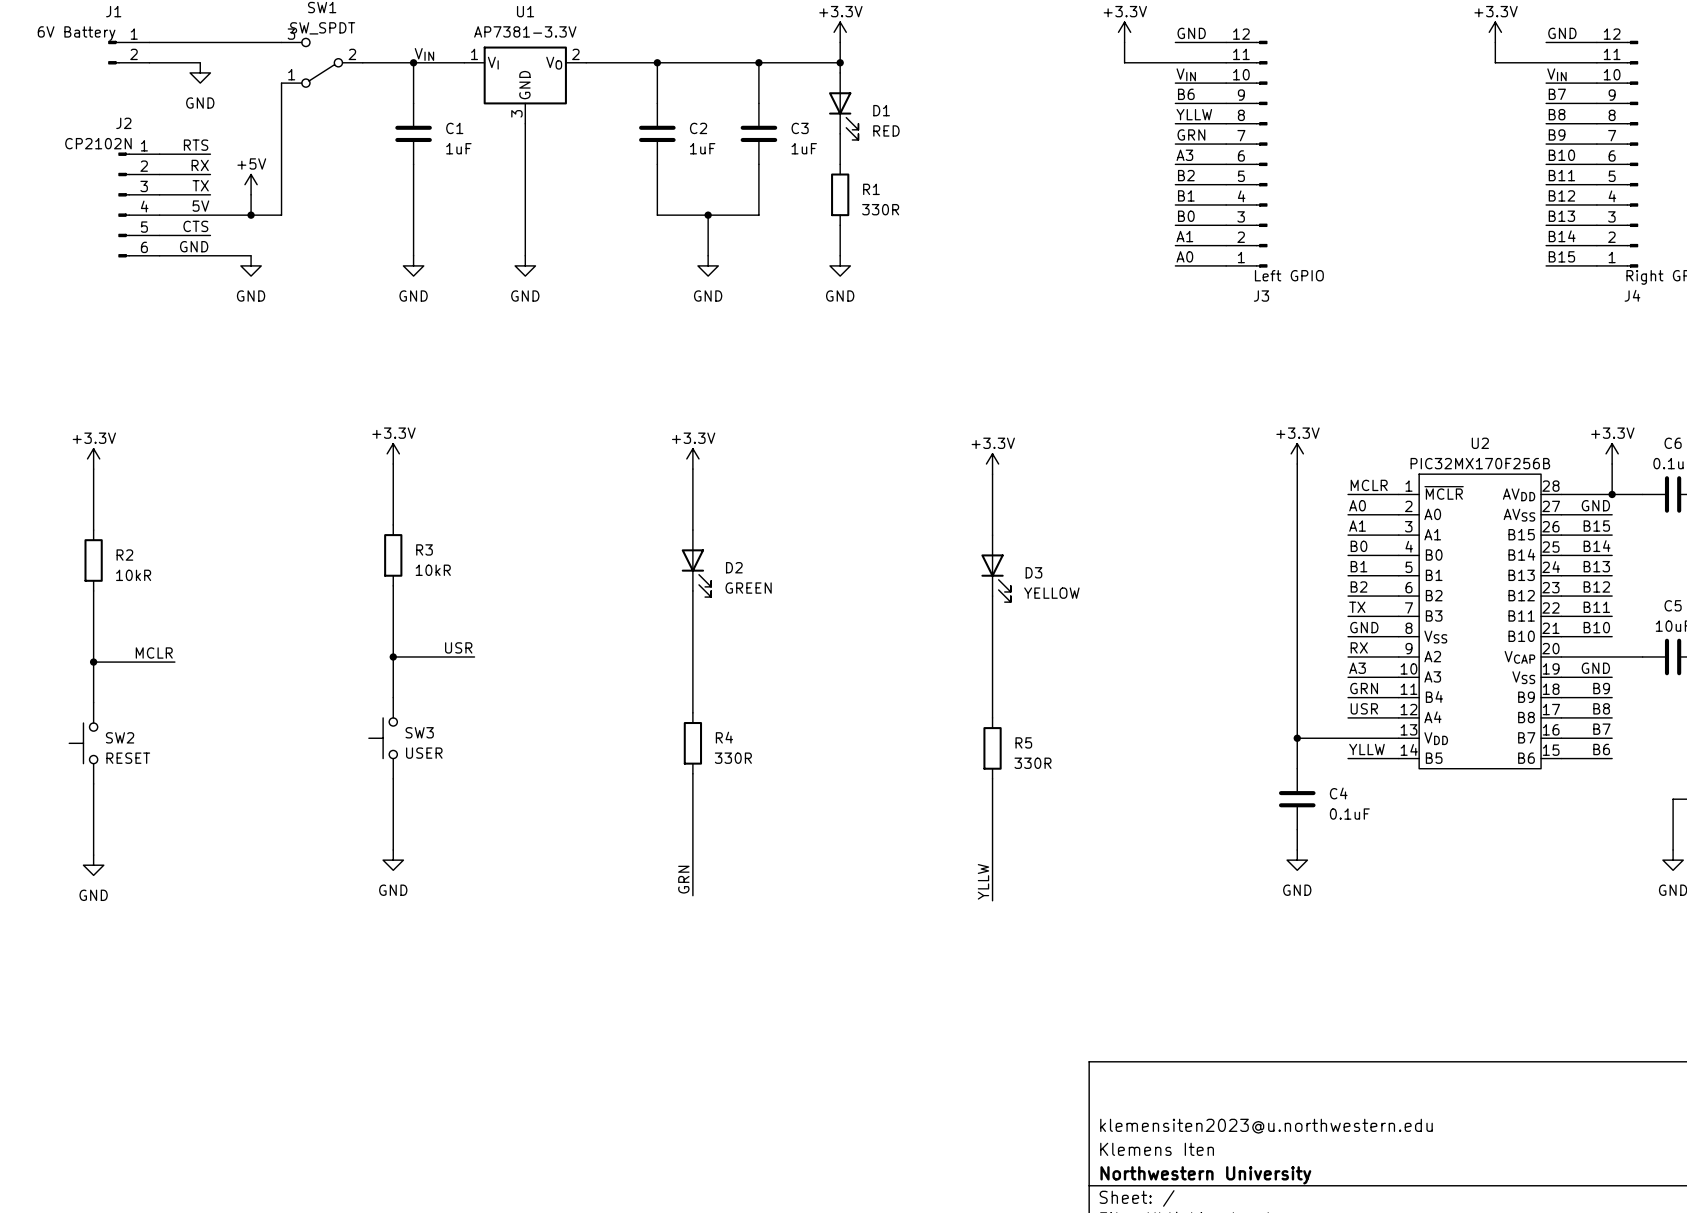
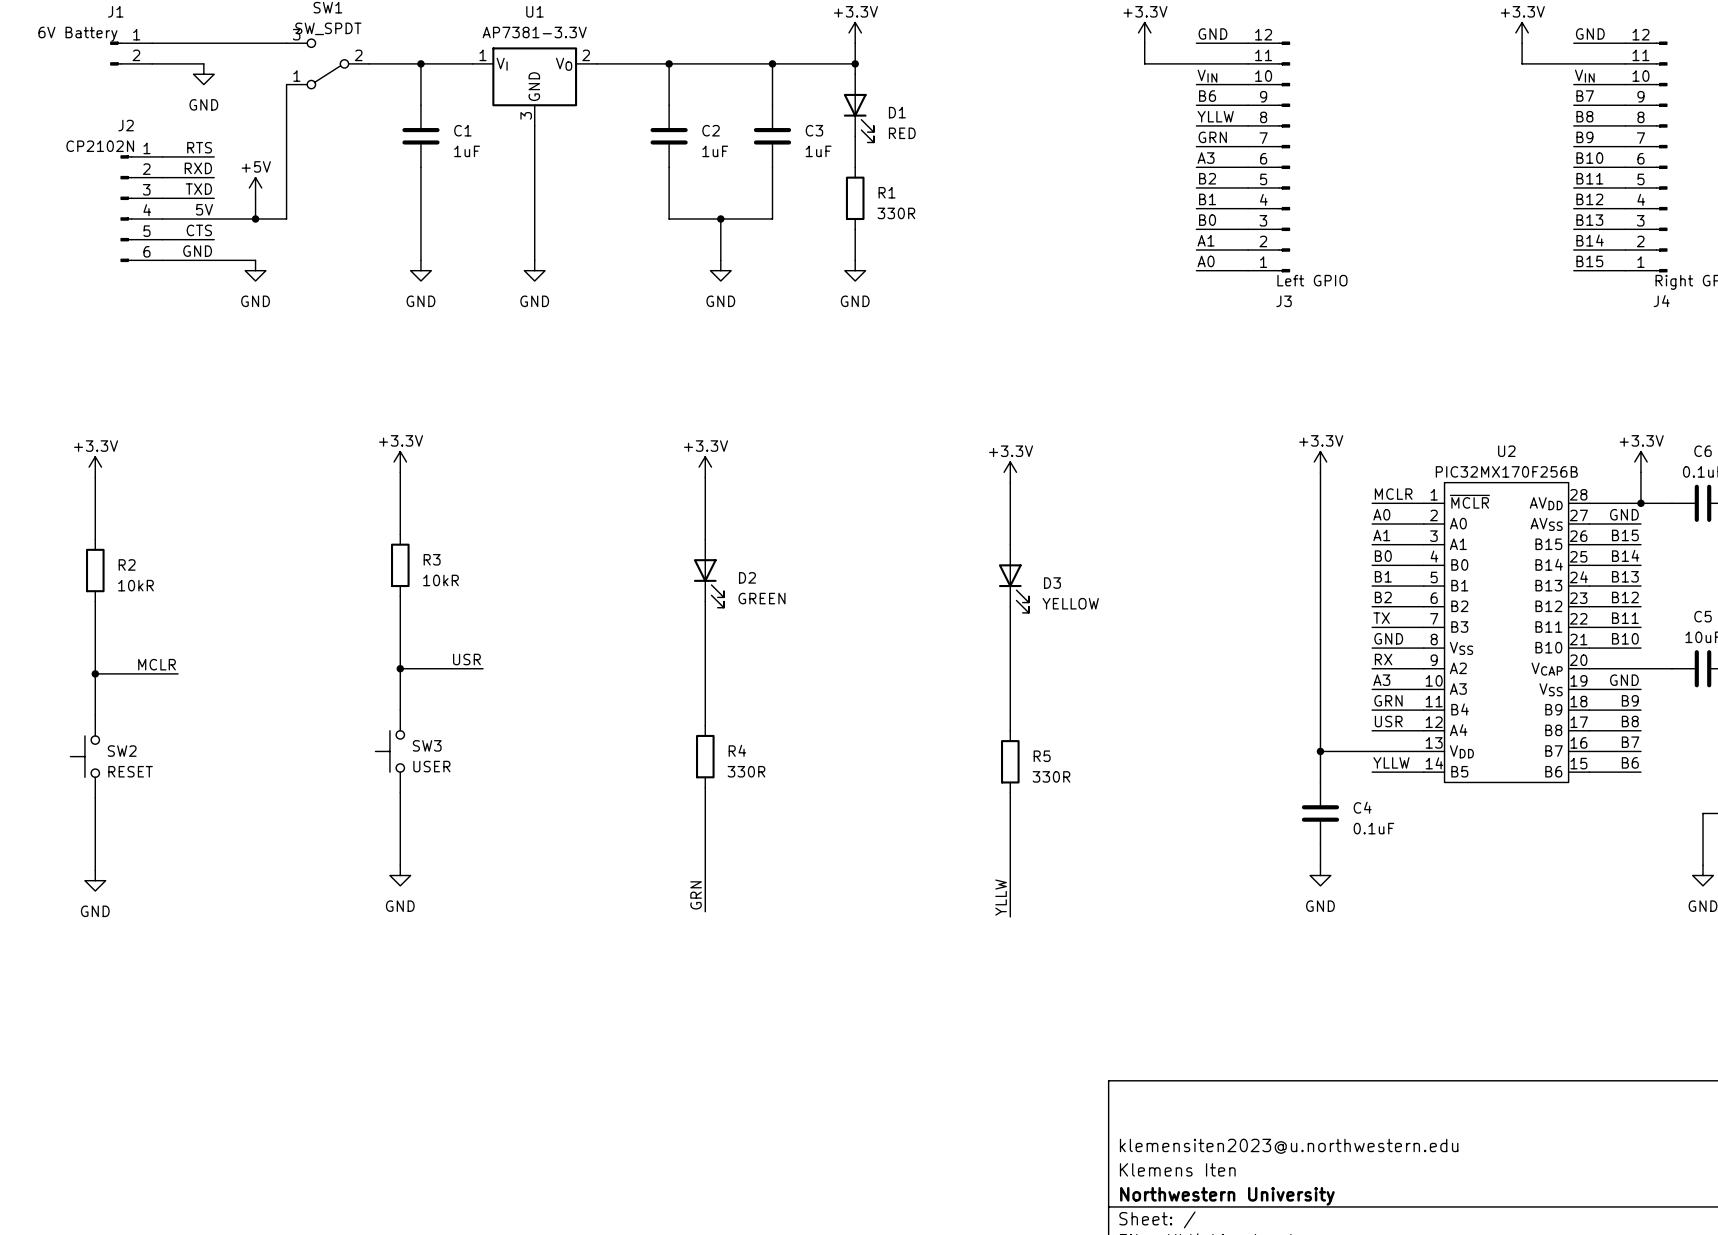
label: VIN (424, 54) -> none
label: RX (200, 165) -> RXD (198, 168)
label: TX (200, 185) -> TXD (198, 189)

